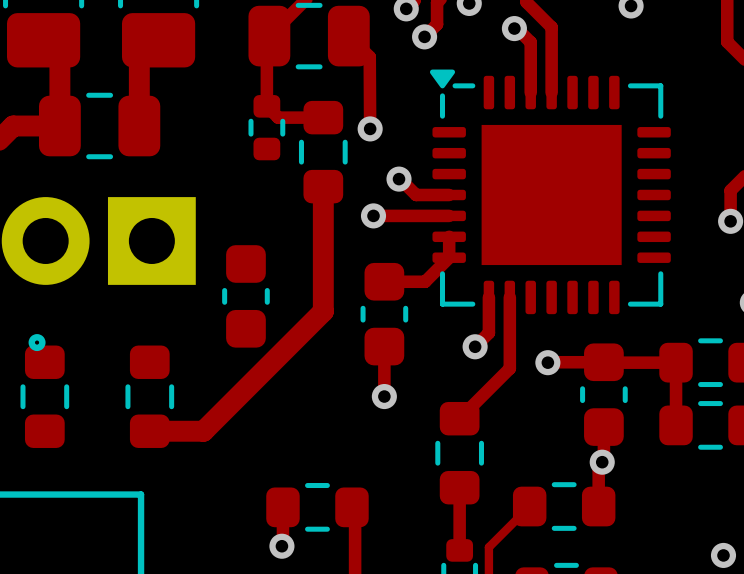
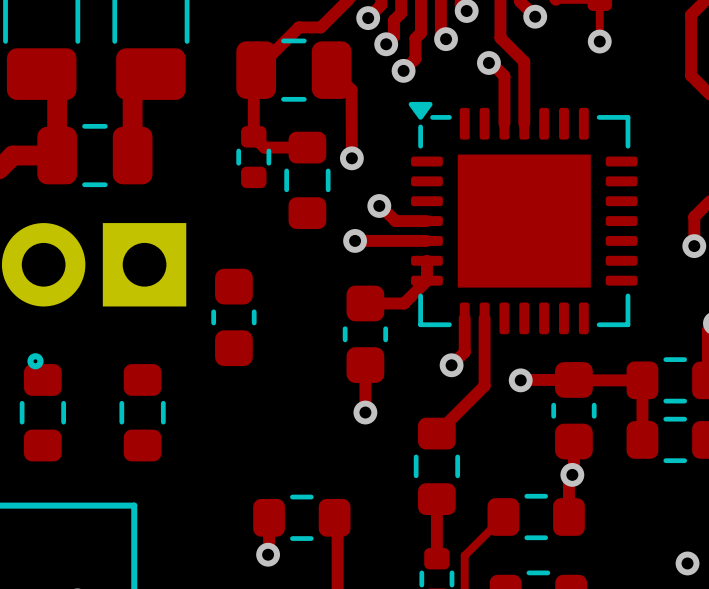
track: (323, 186) (323, 311) (203, 431) (149, 431) -> none

